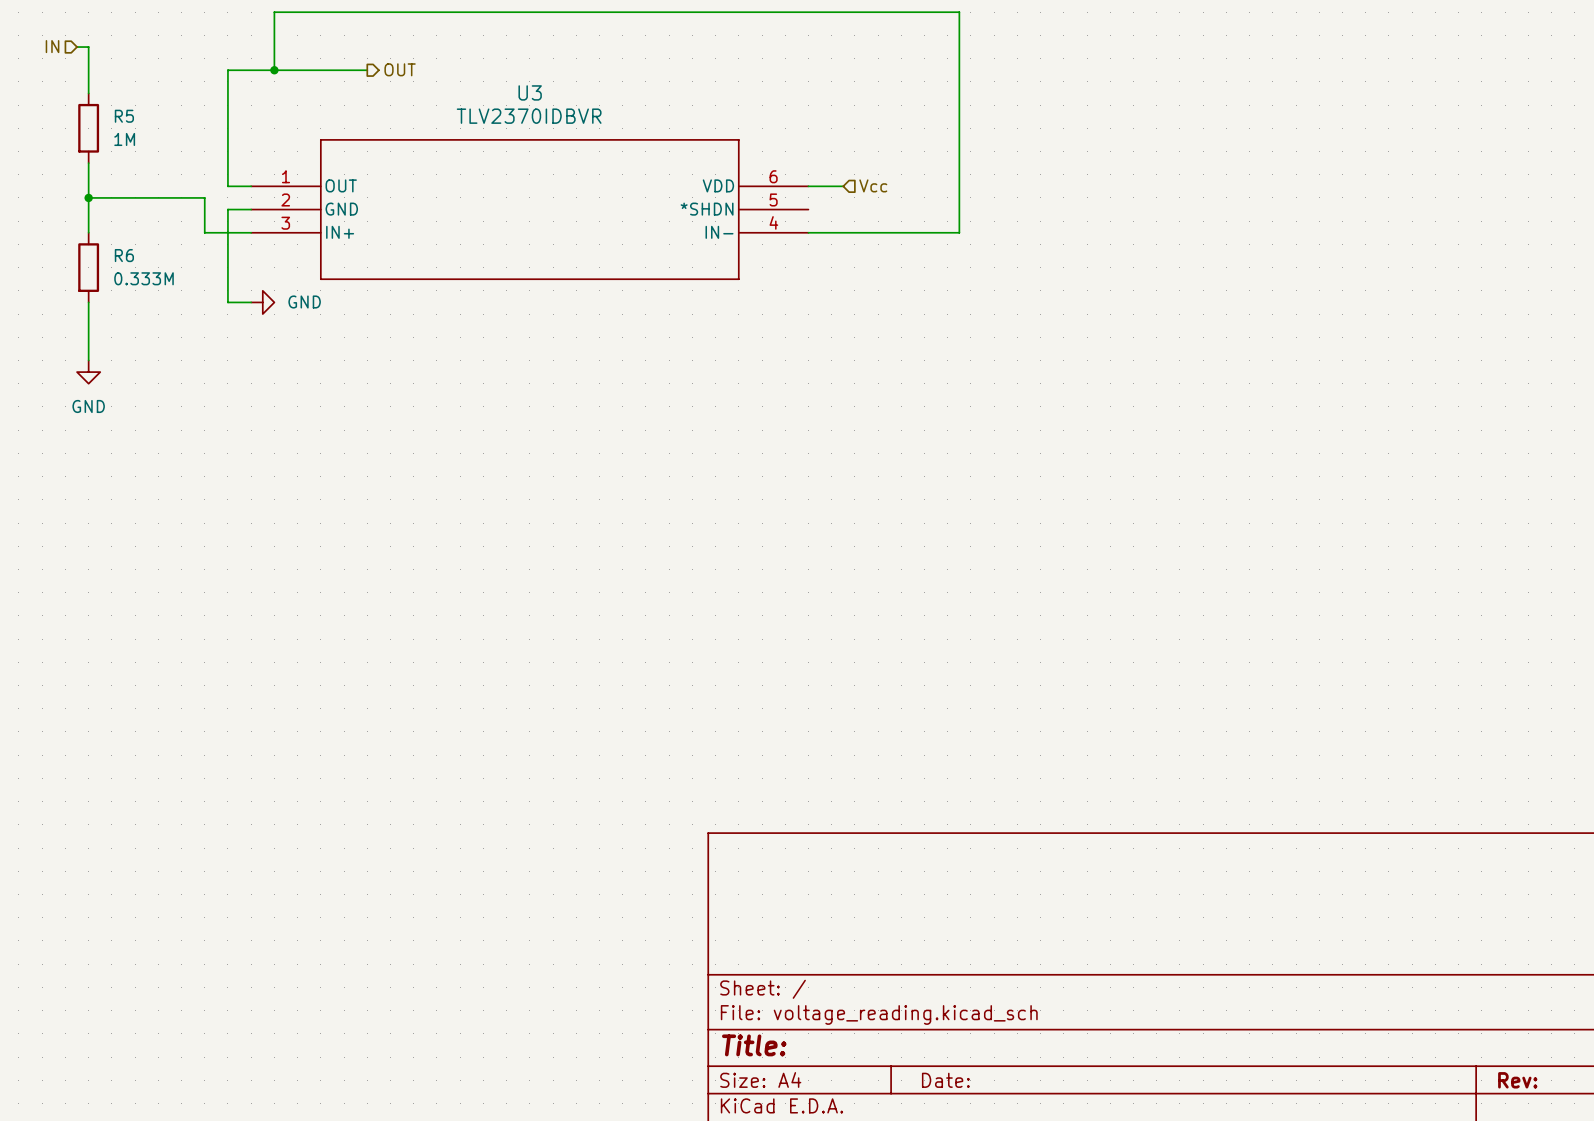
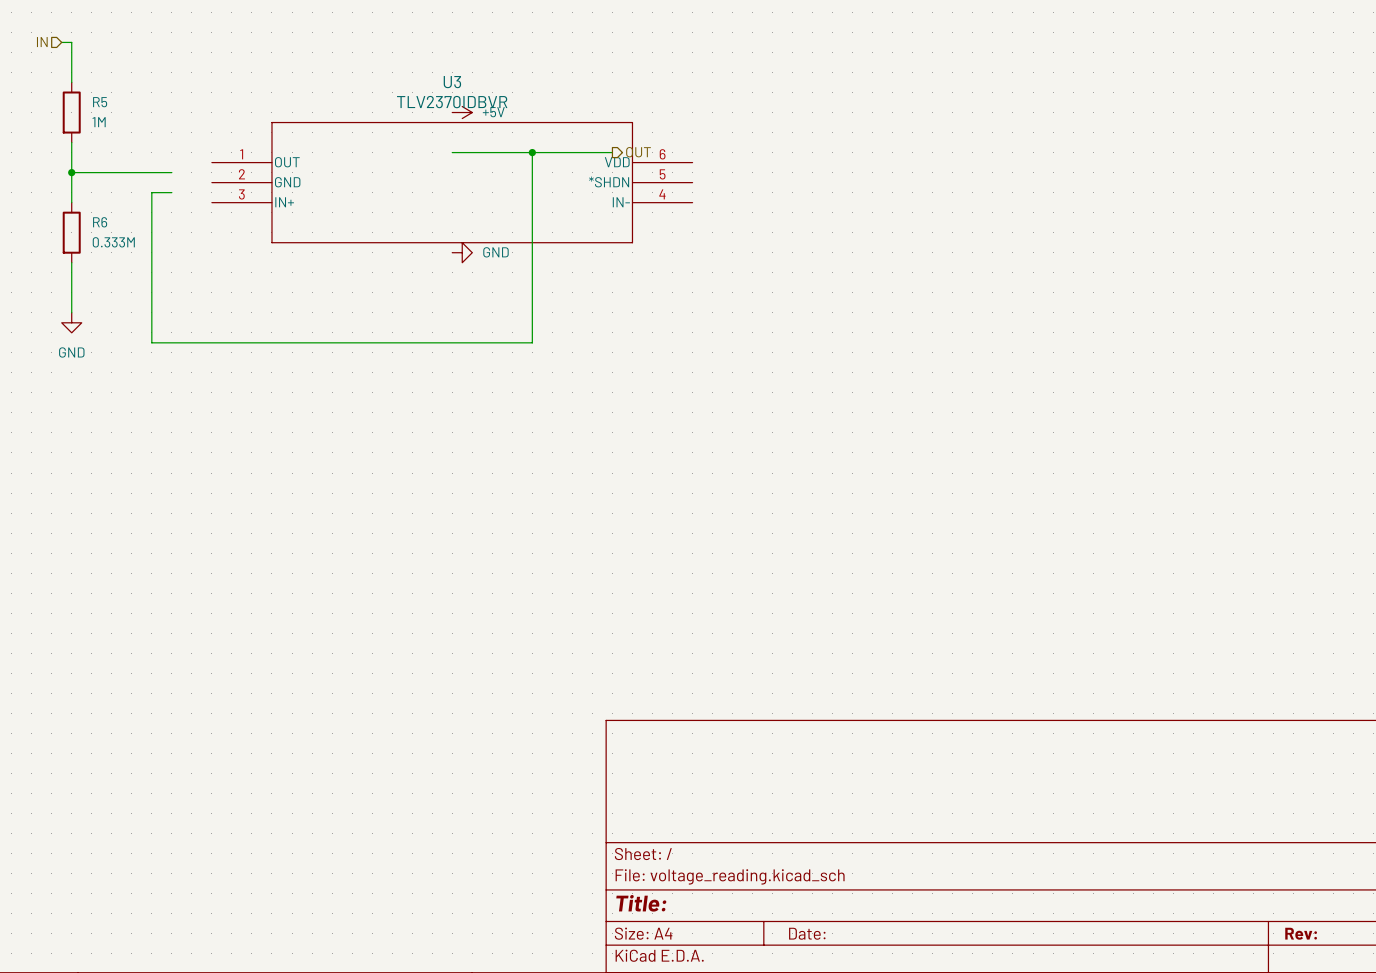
hierarchical label: OUT (400, 69) -> none
wire: (274, 70) (274, 12) (959, 12) (959, 232) (808, 232) -> none
junction: (274, 70) -> none
wire: (367, 70) (227, 70) (227, 186) (251, 186) -> none
power symbol: none -> +5V (462, 112)
wire: none -> (452, 152) (612, 152)
wire: none -> (532, 152) (532, 342) (151, 342) (151, 192) (171, 192)
junction: none -> (532, 152)
hierarchical label: none -> OUT (638, 152)
hierarchical label: Vcc (873, 185) -> none
wire: (808, 186) (843, 186) -> none
wire: (204, 197) (204, 232) (251, 232) -> none
wire: (251, 209) (227, 209) (227, 302) (251, 302) -> none
power symbol: none -> GND (462, 252)
power symbol: GND (262, 302) -> none

